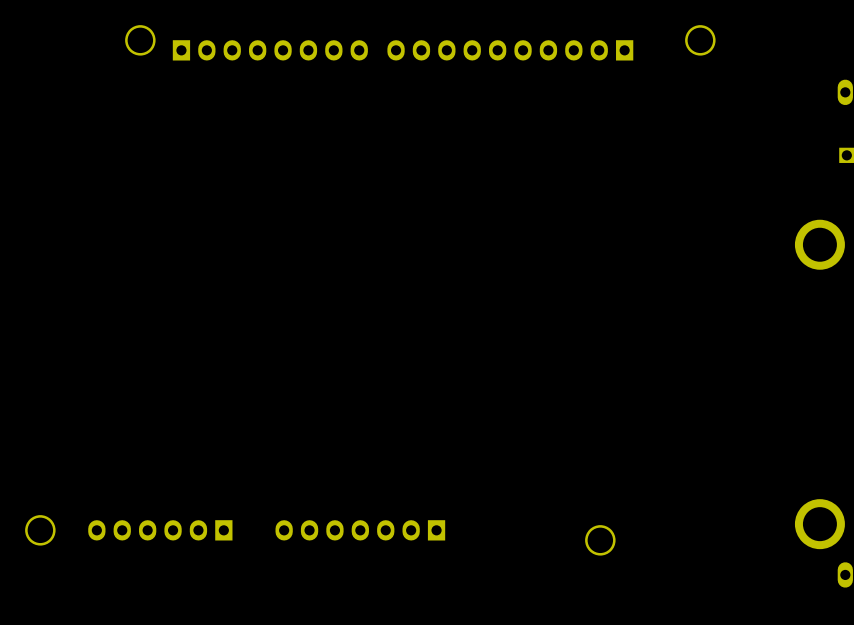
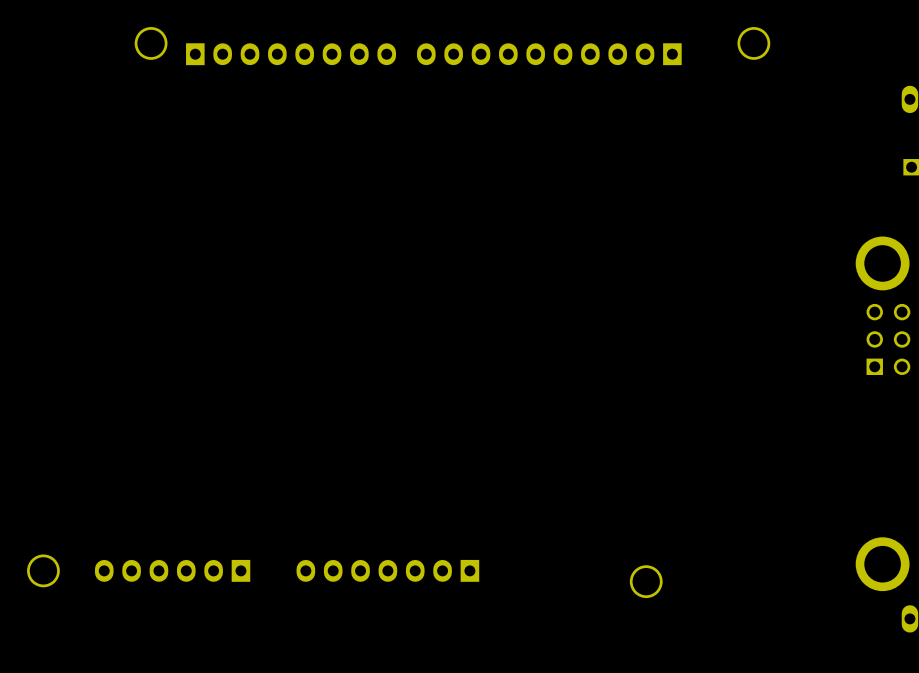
part: none -> (888, 339)

